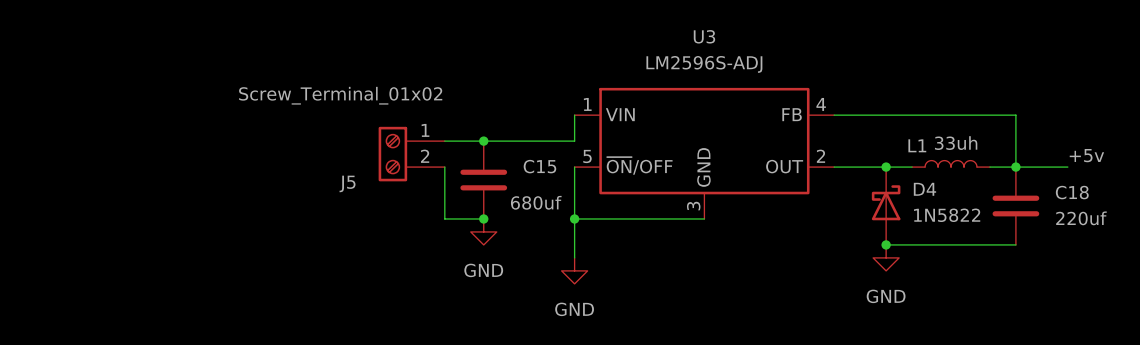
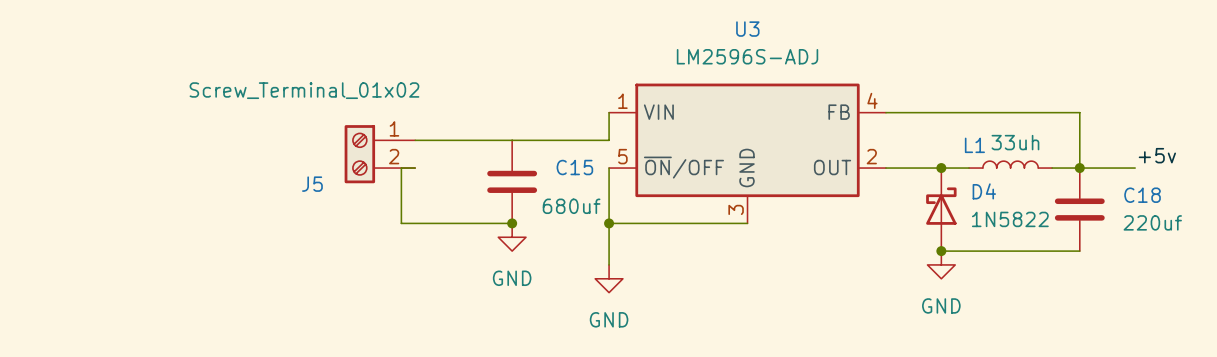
junction: (483, 141) -> none
J5 position: (411, 154) -> (379, 154)
wire: (444, 167) (444, 218) -> (415, 168) (401, 168) (401, 223) (470, 223)

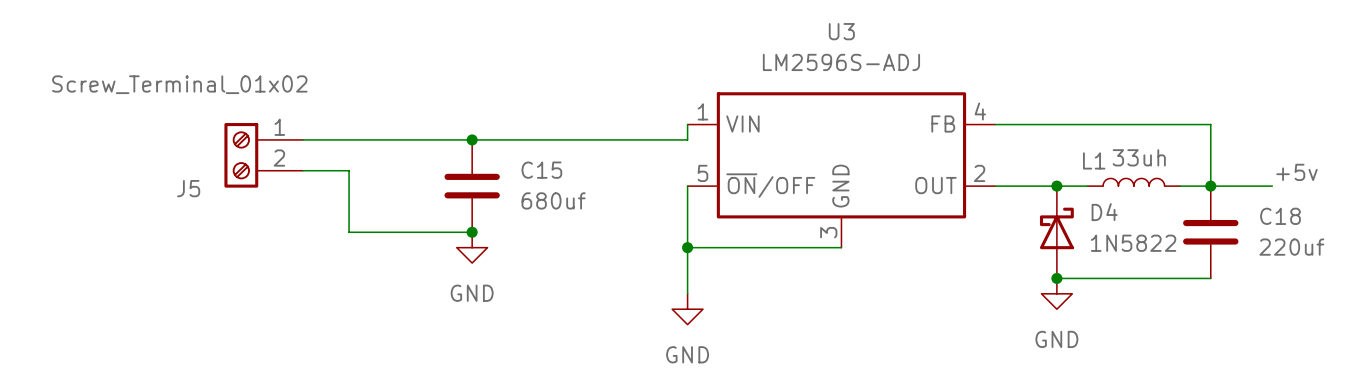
junction: none -> (472, 139)
wire: (609, 126) (609, 140) (415, 140) -> (687, 139) (302, 139)
wire: none -> (302, 170) (349, 170) (349, 232) (472, 232)
J5 position: (379, 154) -> (263, 155)
wire: (415, 168) (401, 168) (401, 223) (512, 223) -> none
C15 position: (512, 181) -> (472, 186)
C15 value position: 680uf (571, 206) -> 680uf (553, 200)
junction: none -> (472, 232)
junction: (512, 223) -> none
power symbol position: GND (512, 237) -> GND (472, 247)

